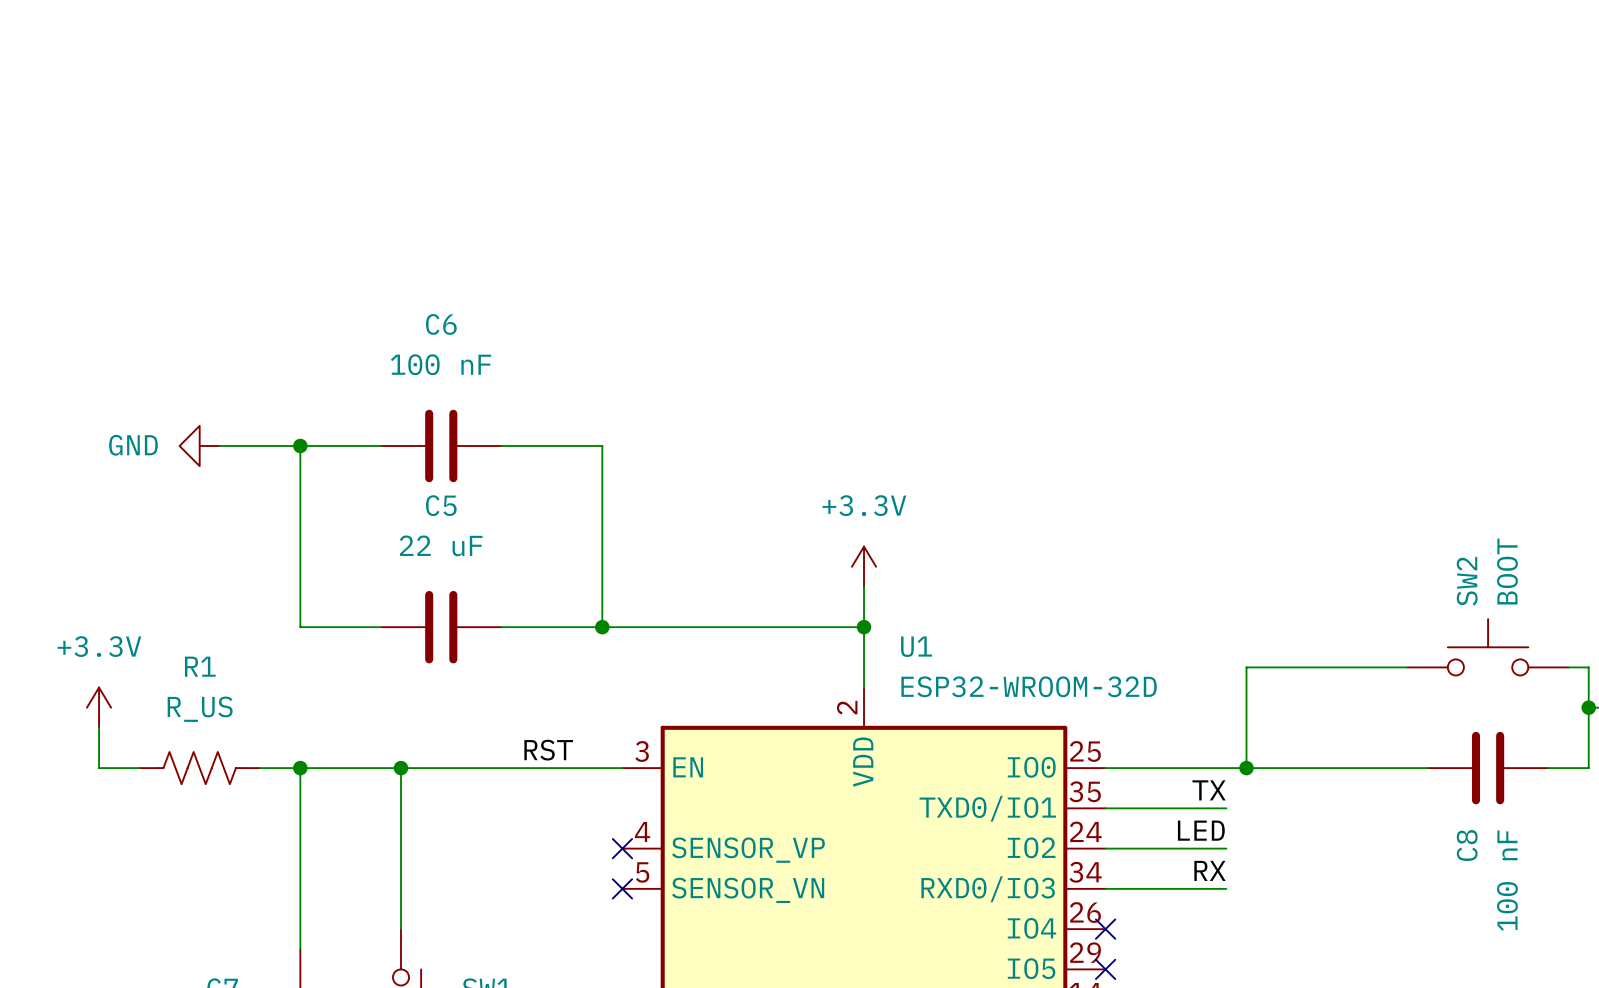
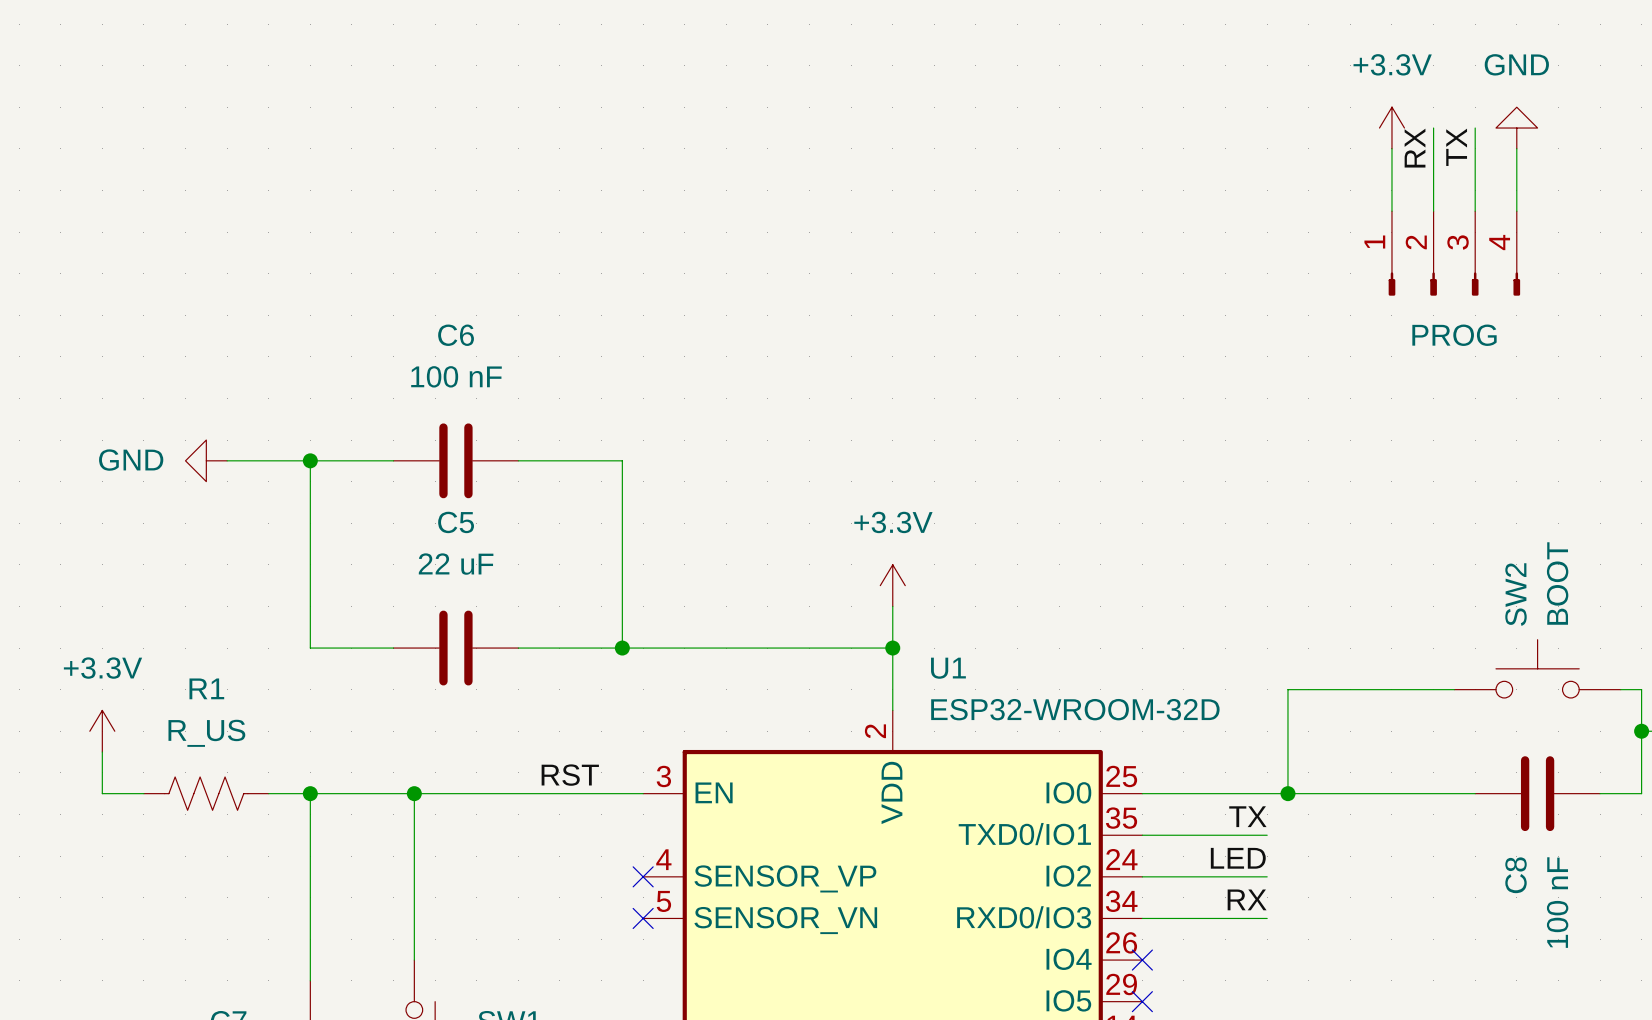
power symbol: none -> +3.3V (1391, 128)
wire: none -> (1433, 128) (1433, 211)
wire: none -> (1475, 128) (1475, 211)
power symbol: none -> GND (1516, 128)
label: none -> RX (1415, 148)
label: none -> TX (1456, 147)
wire: none -> (1391, 148) (1391, 211)
wire: none -> (1516, 148) (1516, 211)
part: none -> PROG (1454, 253)

